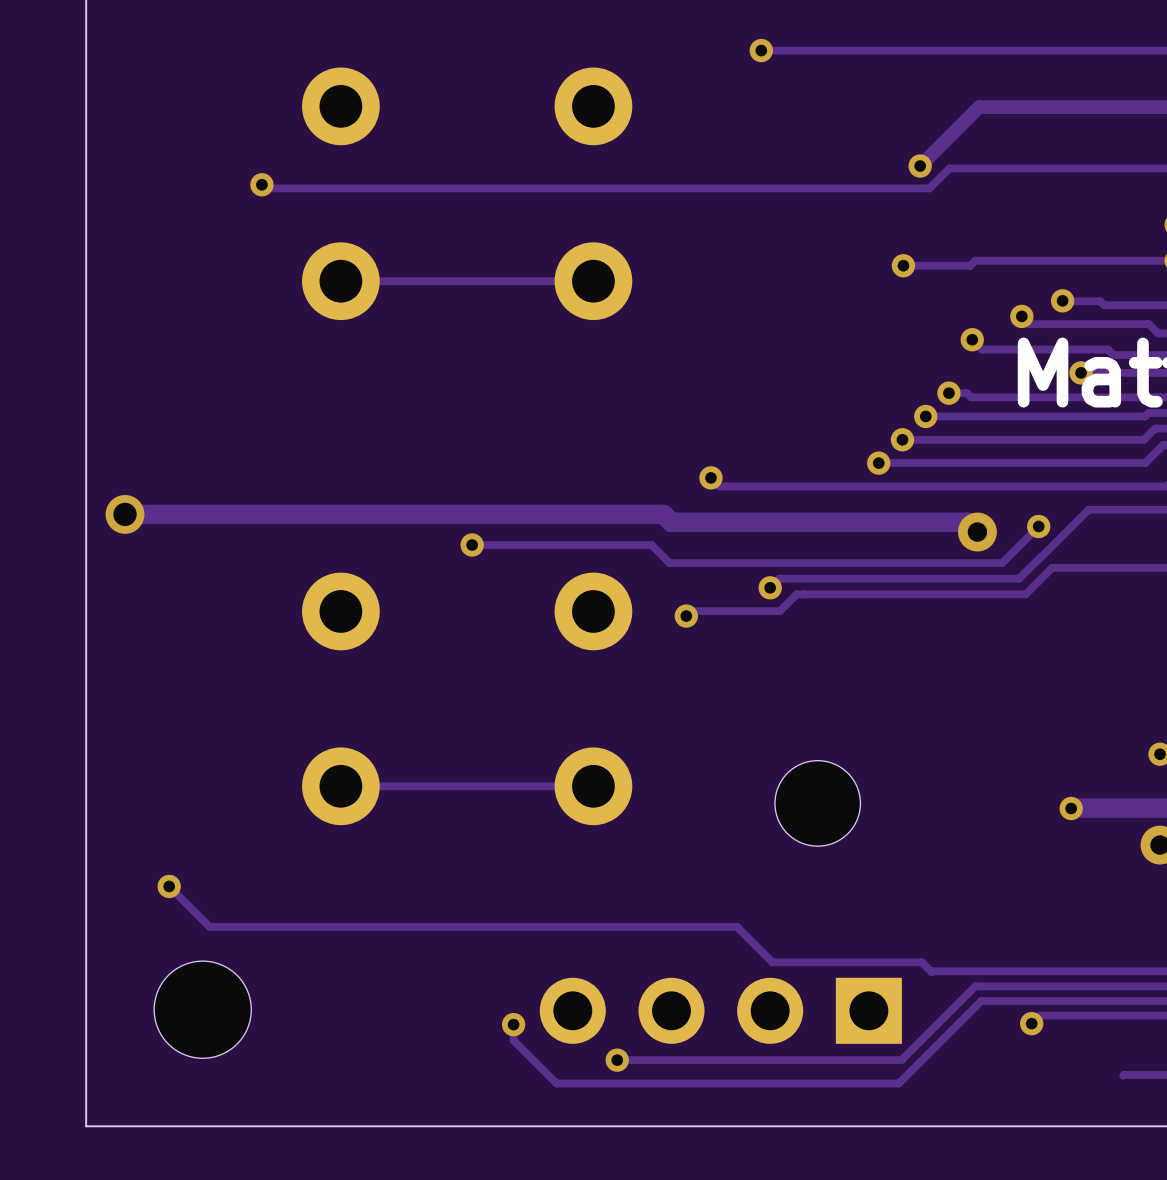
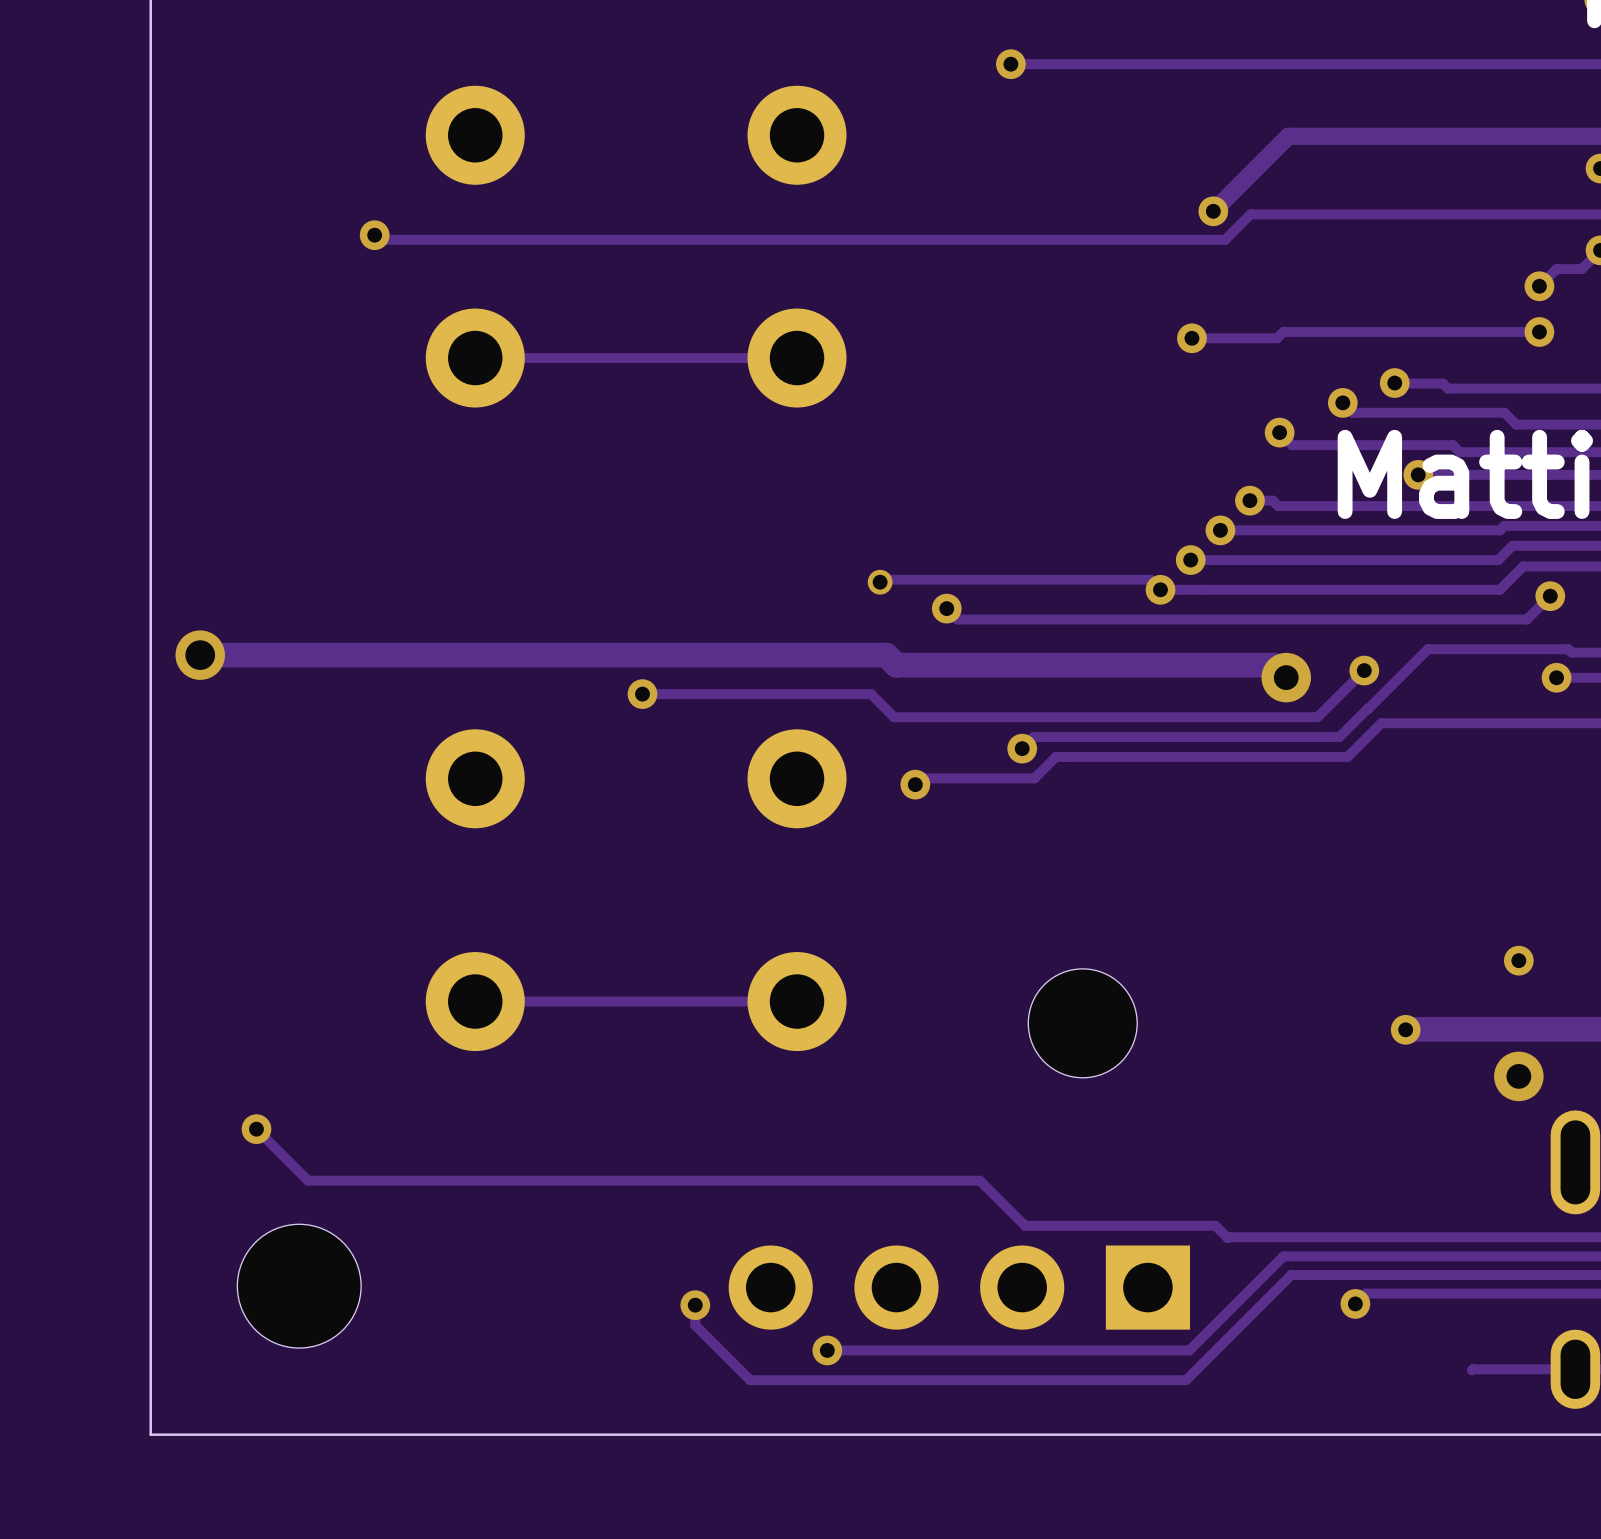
track: none -> (880, 582) (882, 579) (1150, 579) (1160, 589)
via: none -> (880, 582)

